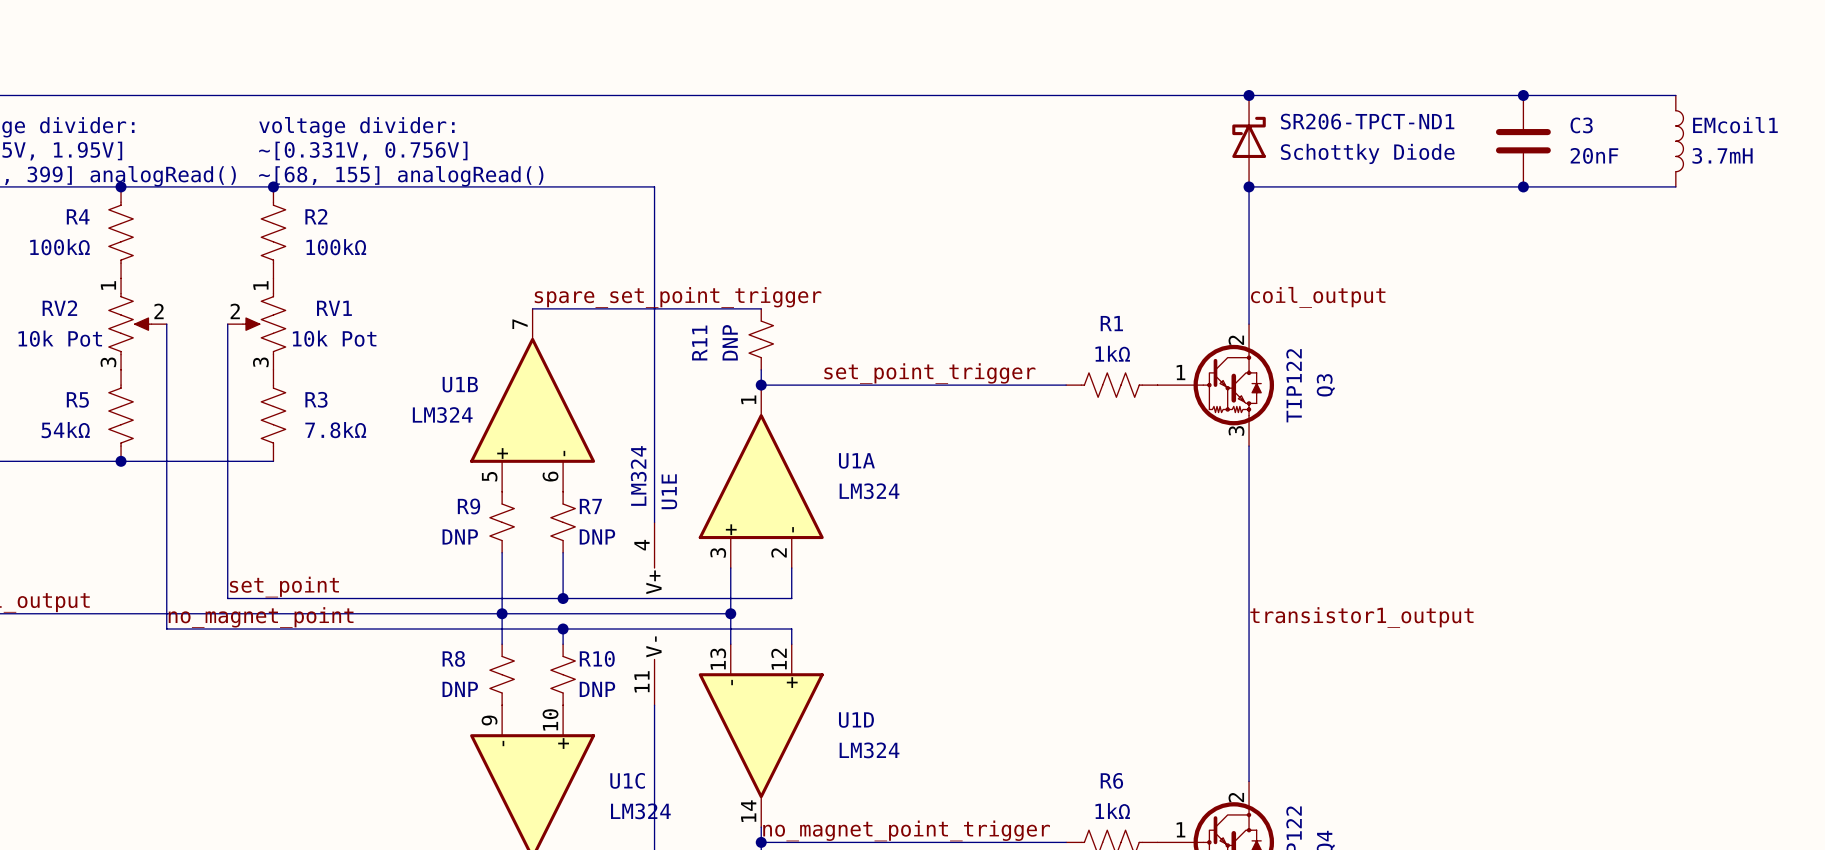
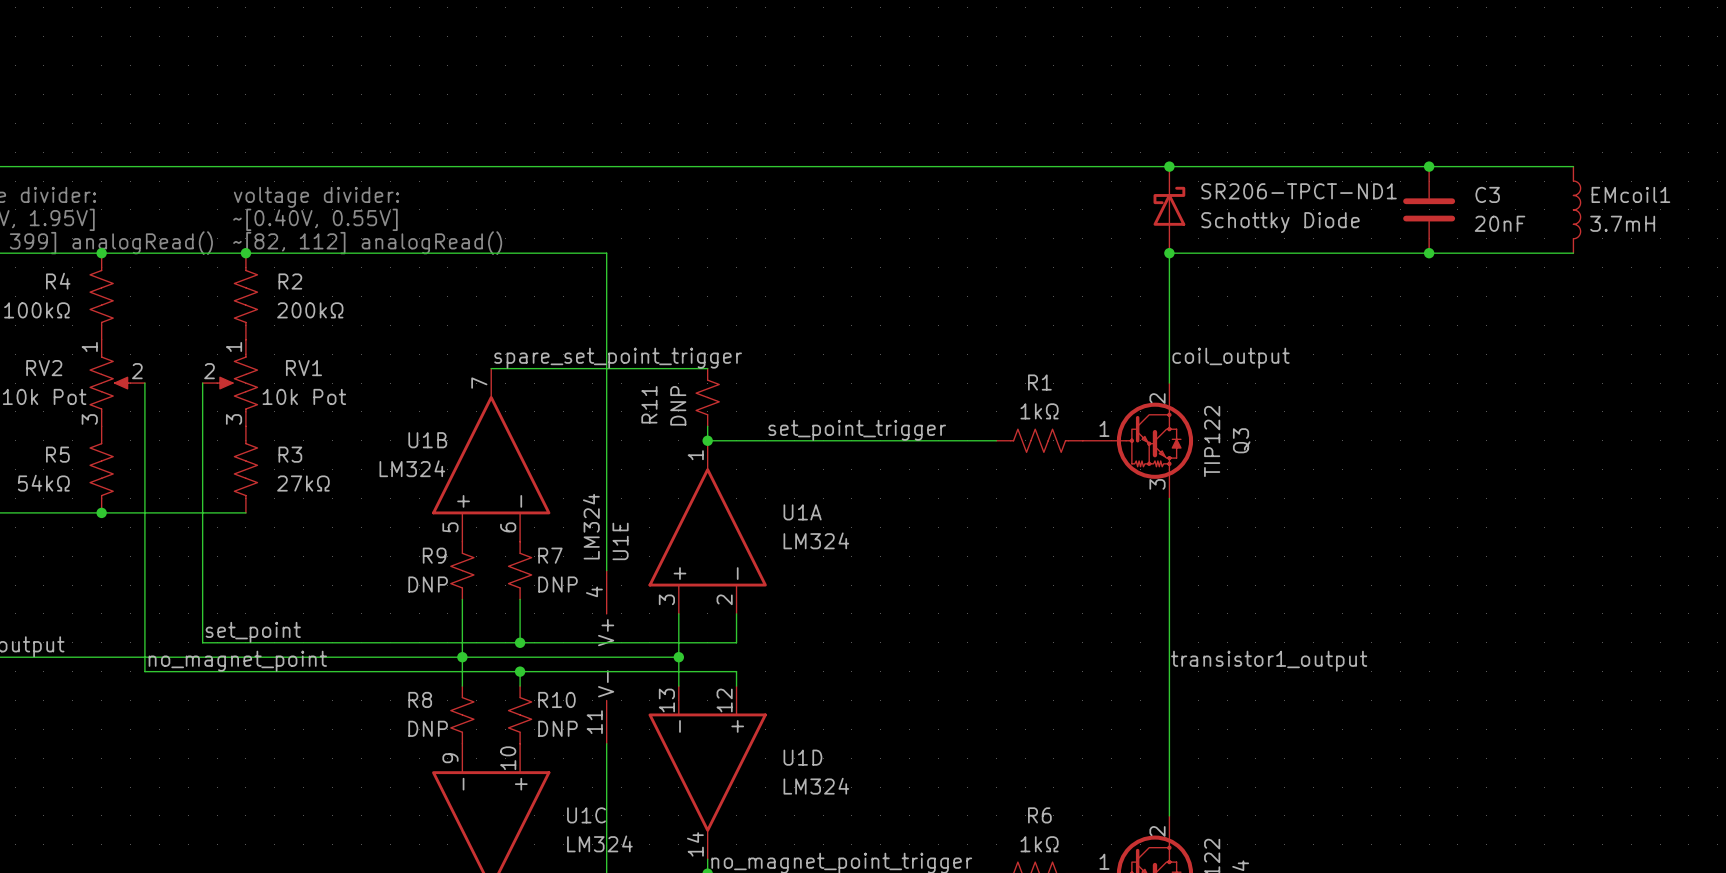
text: ~[0.331V, 0.756V] (363, 151) -> ~[0.40V, 0.55V] (315, 219)
text: ~[68, 155] analogRead() (401, 176) -> ~[82, 112] analogRead() (367, 243)
R2 value: 100kΩ (336, 247) -> 200kΩ (310, 310)
R3 value: 7.8kΩ (335, 430) -> 27kΩ (303, 483)

